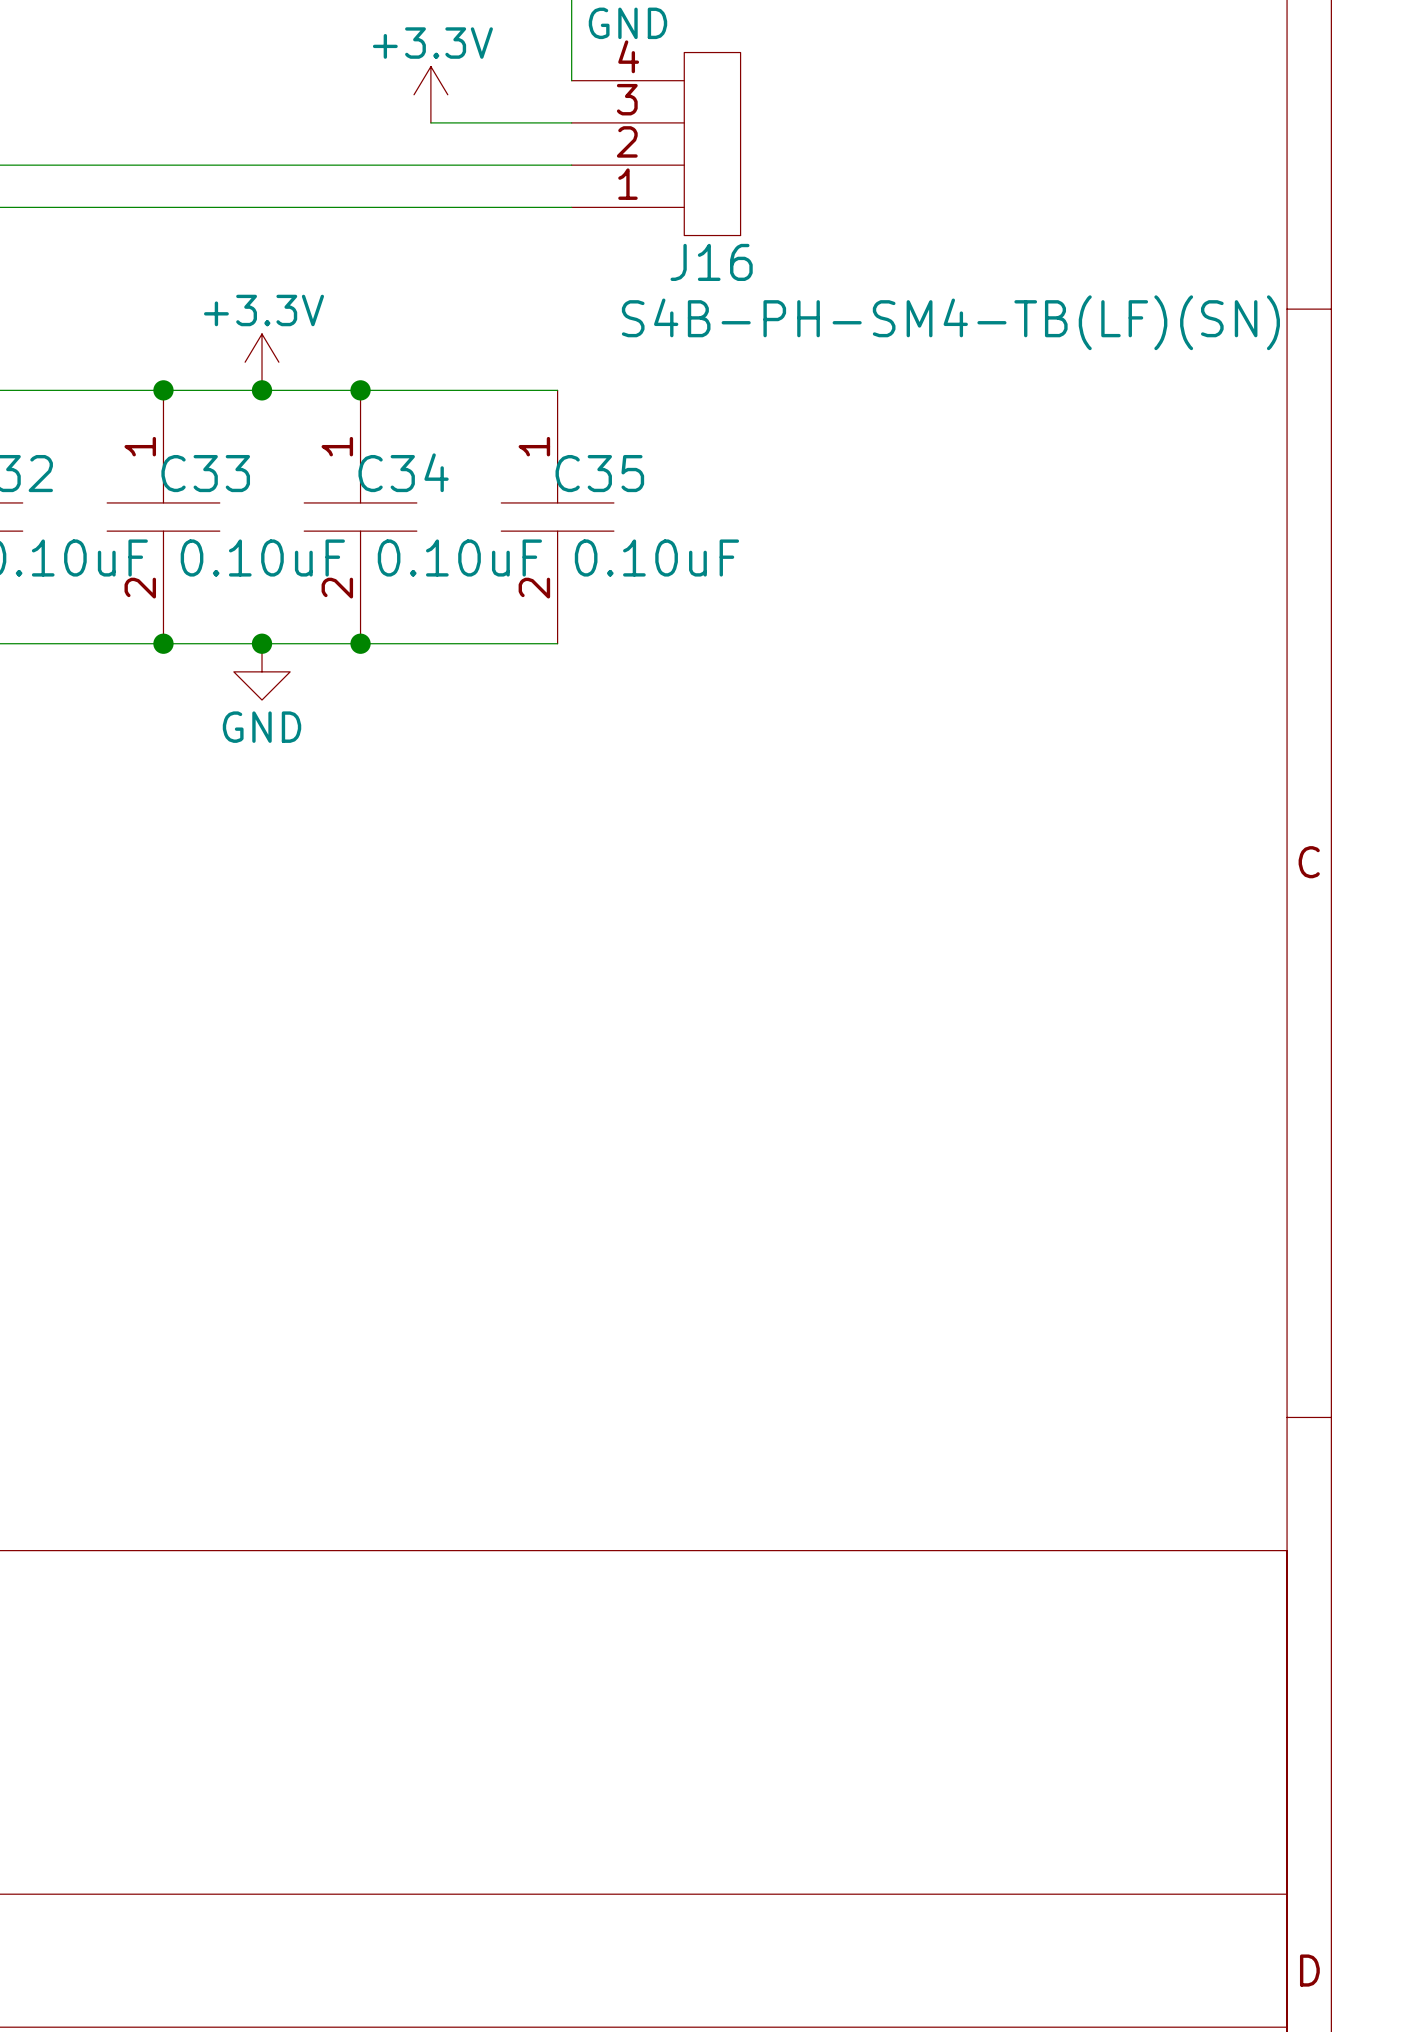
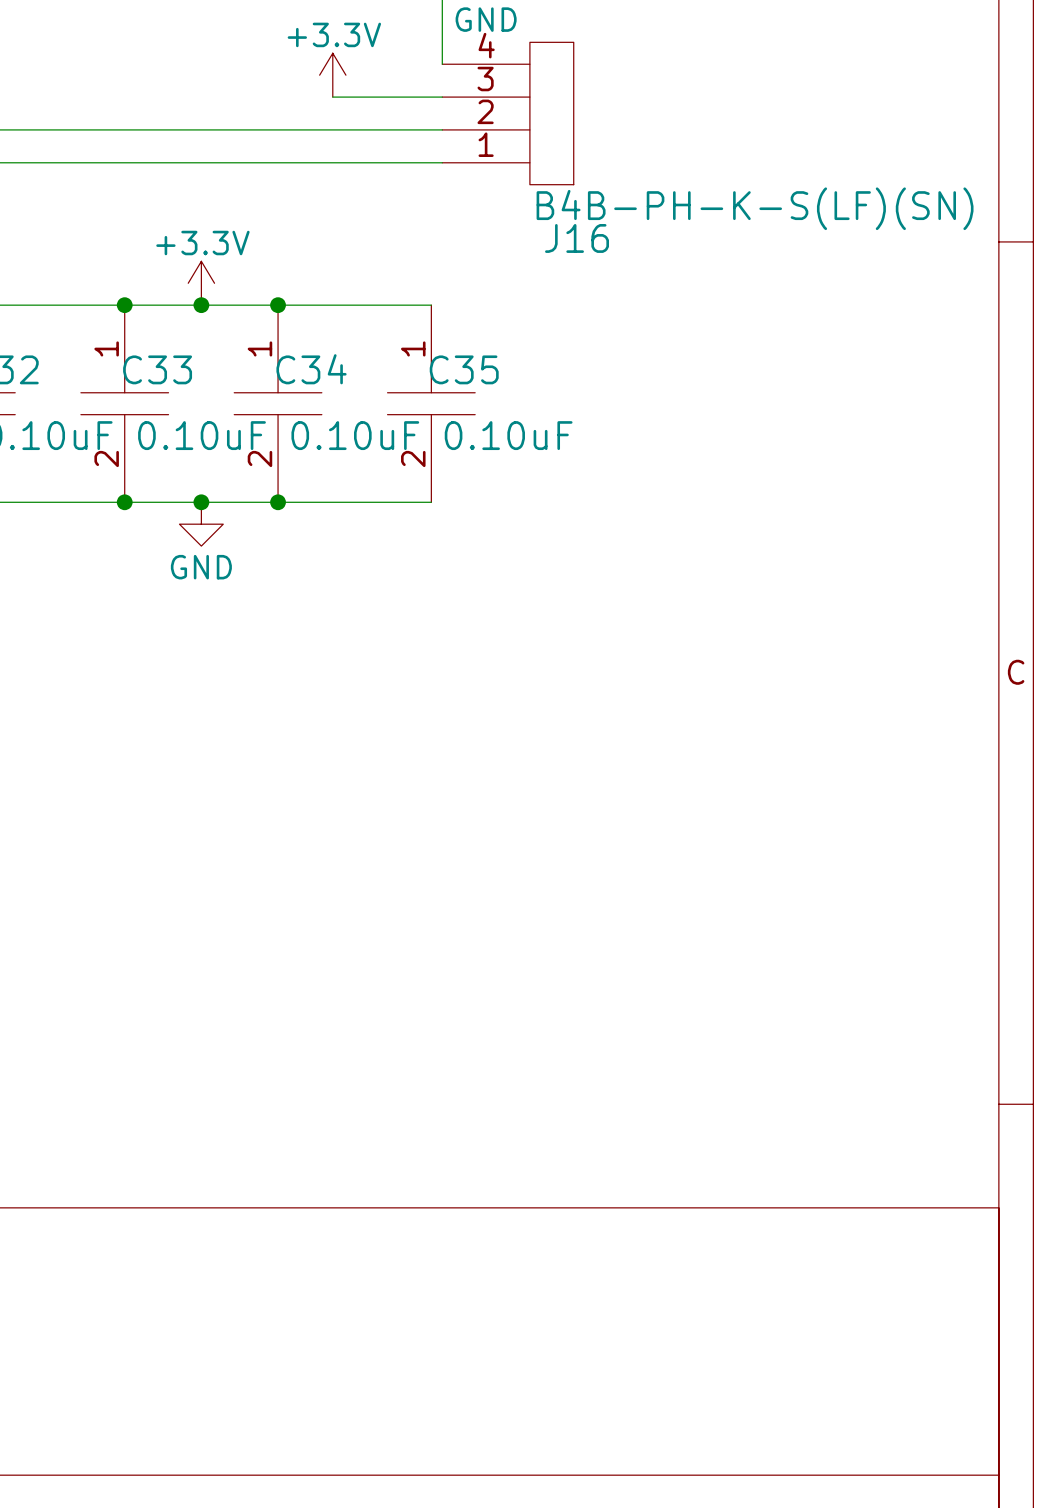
J16 name position: J16 (711, 262) -> J16 (577, 238)
J16 value: S4B-PH-SM4-TB(LF)(SN) (950, 322) -> B4B-PH-K-S(LF)(SN) (755, 208)

